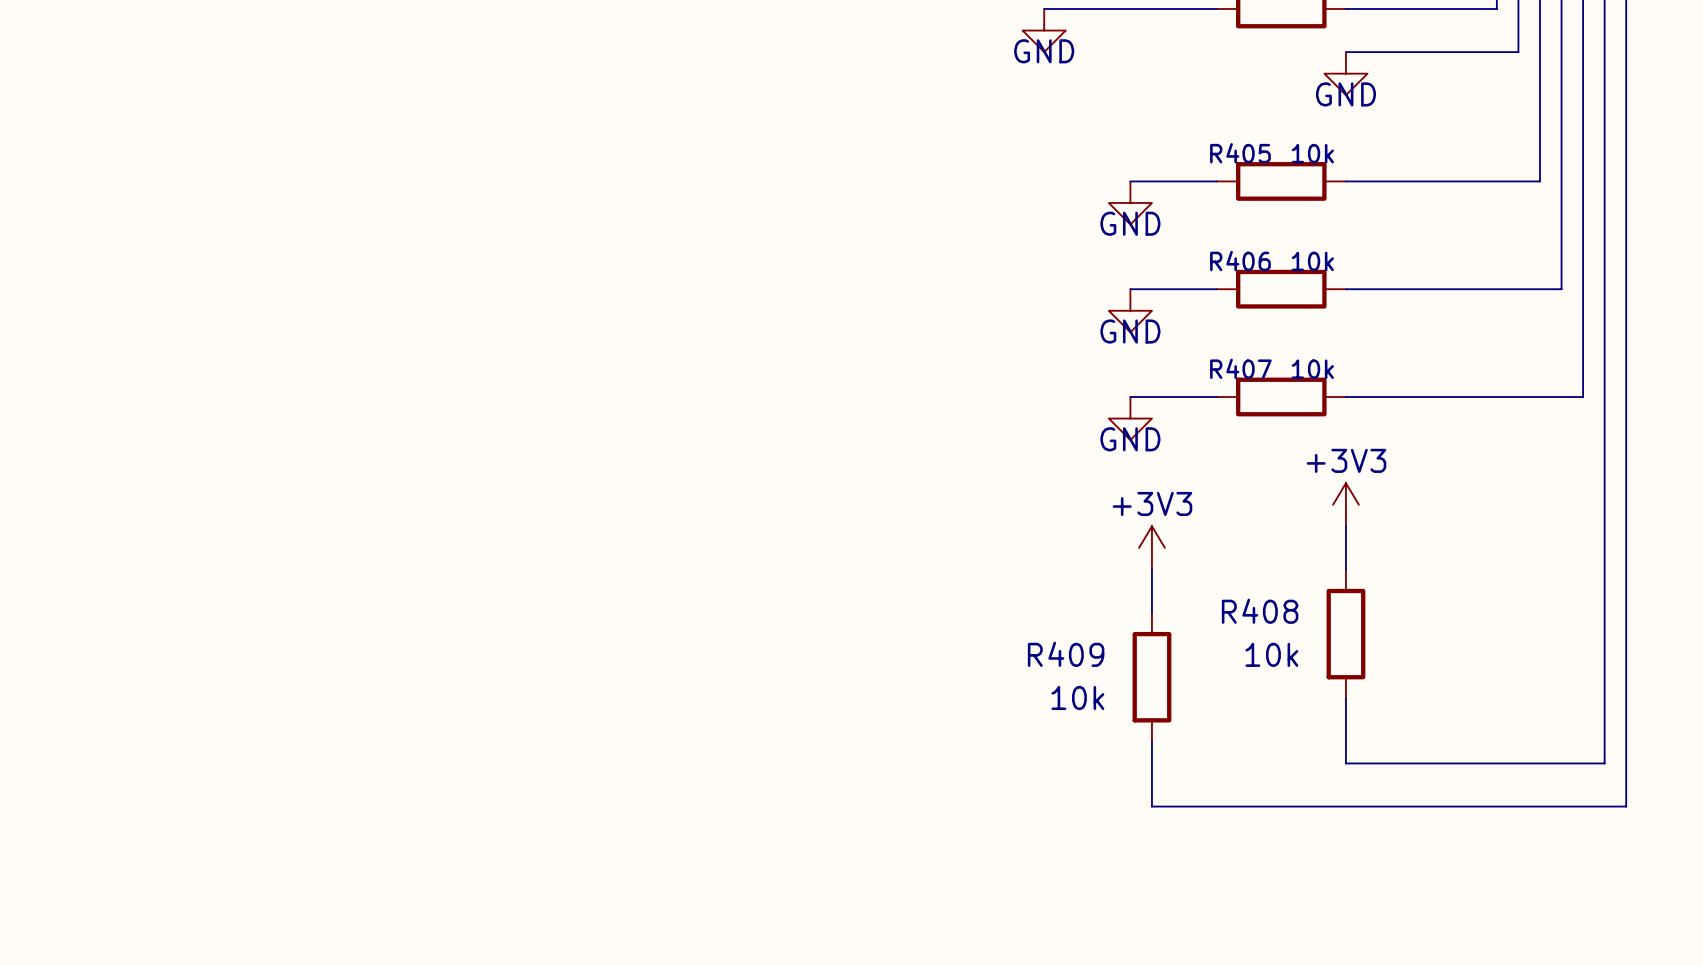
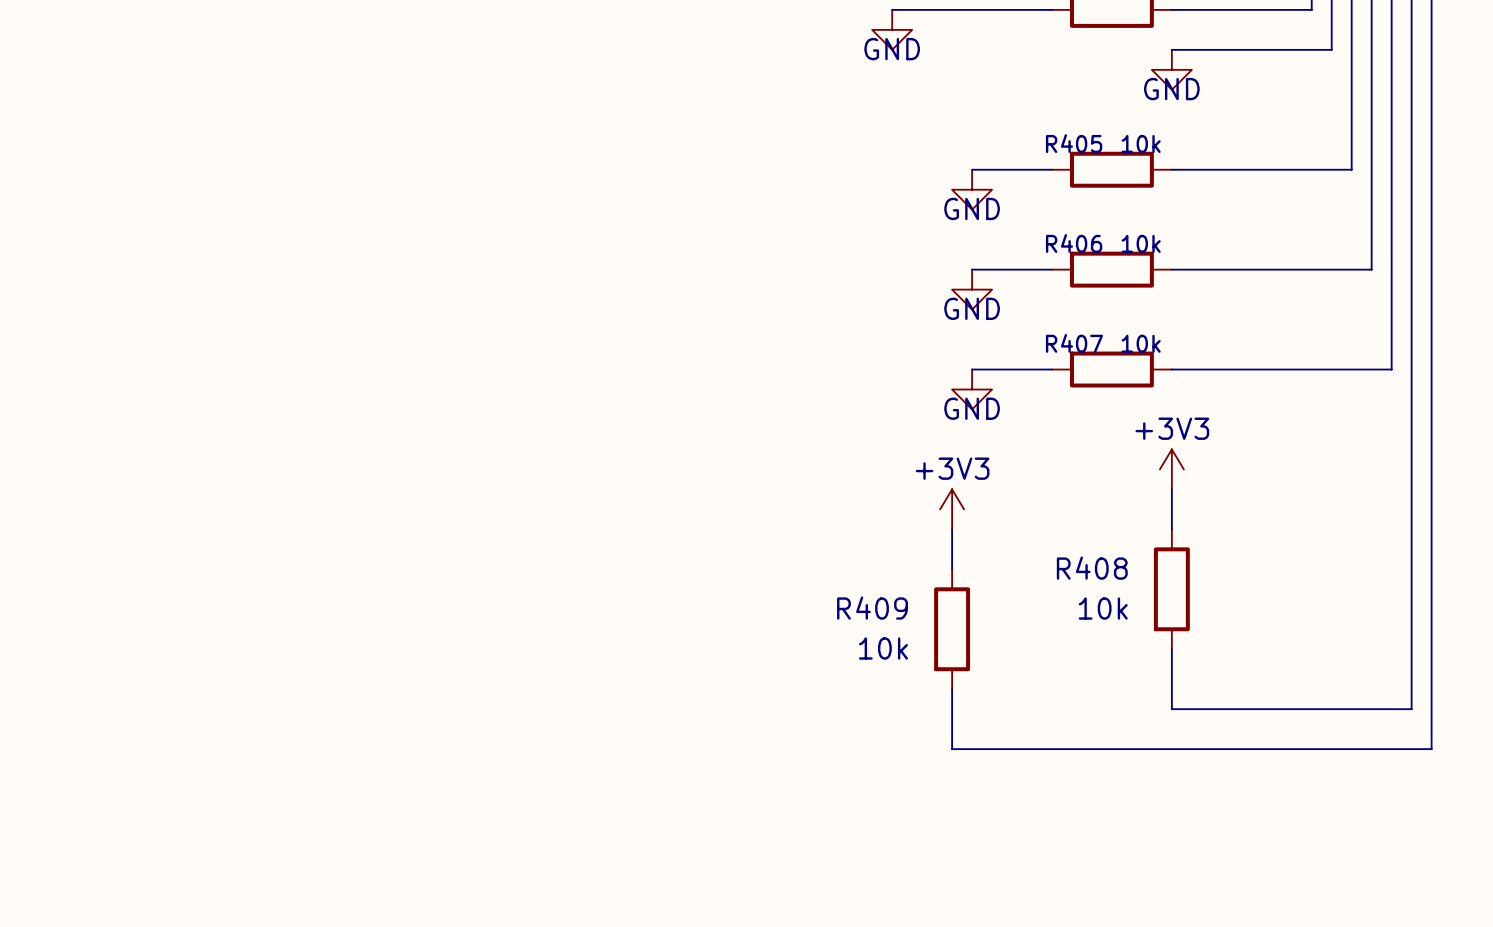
power symbol position: +3V3 (1151, 547) -> +3V3 (952, 509)
wire: (1151, 569) (1151, 612) -> (952, 529) (952, 569)
R409 position: (1151, 677) -> (952, 629)
wire: (1151, 741) (1151, 806) -> (952, 689) (952, 749) (992, 749)

